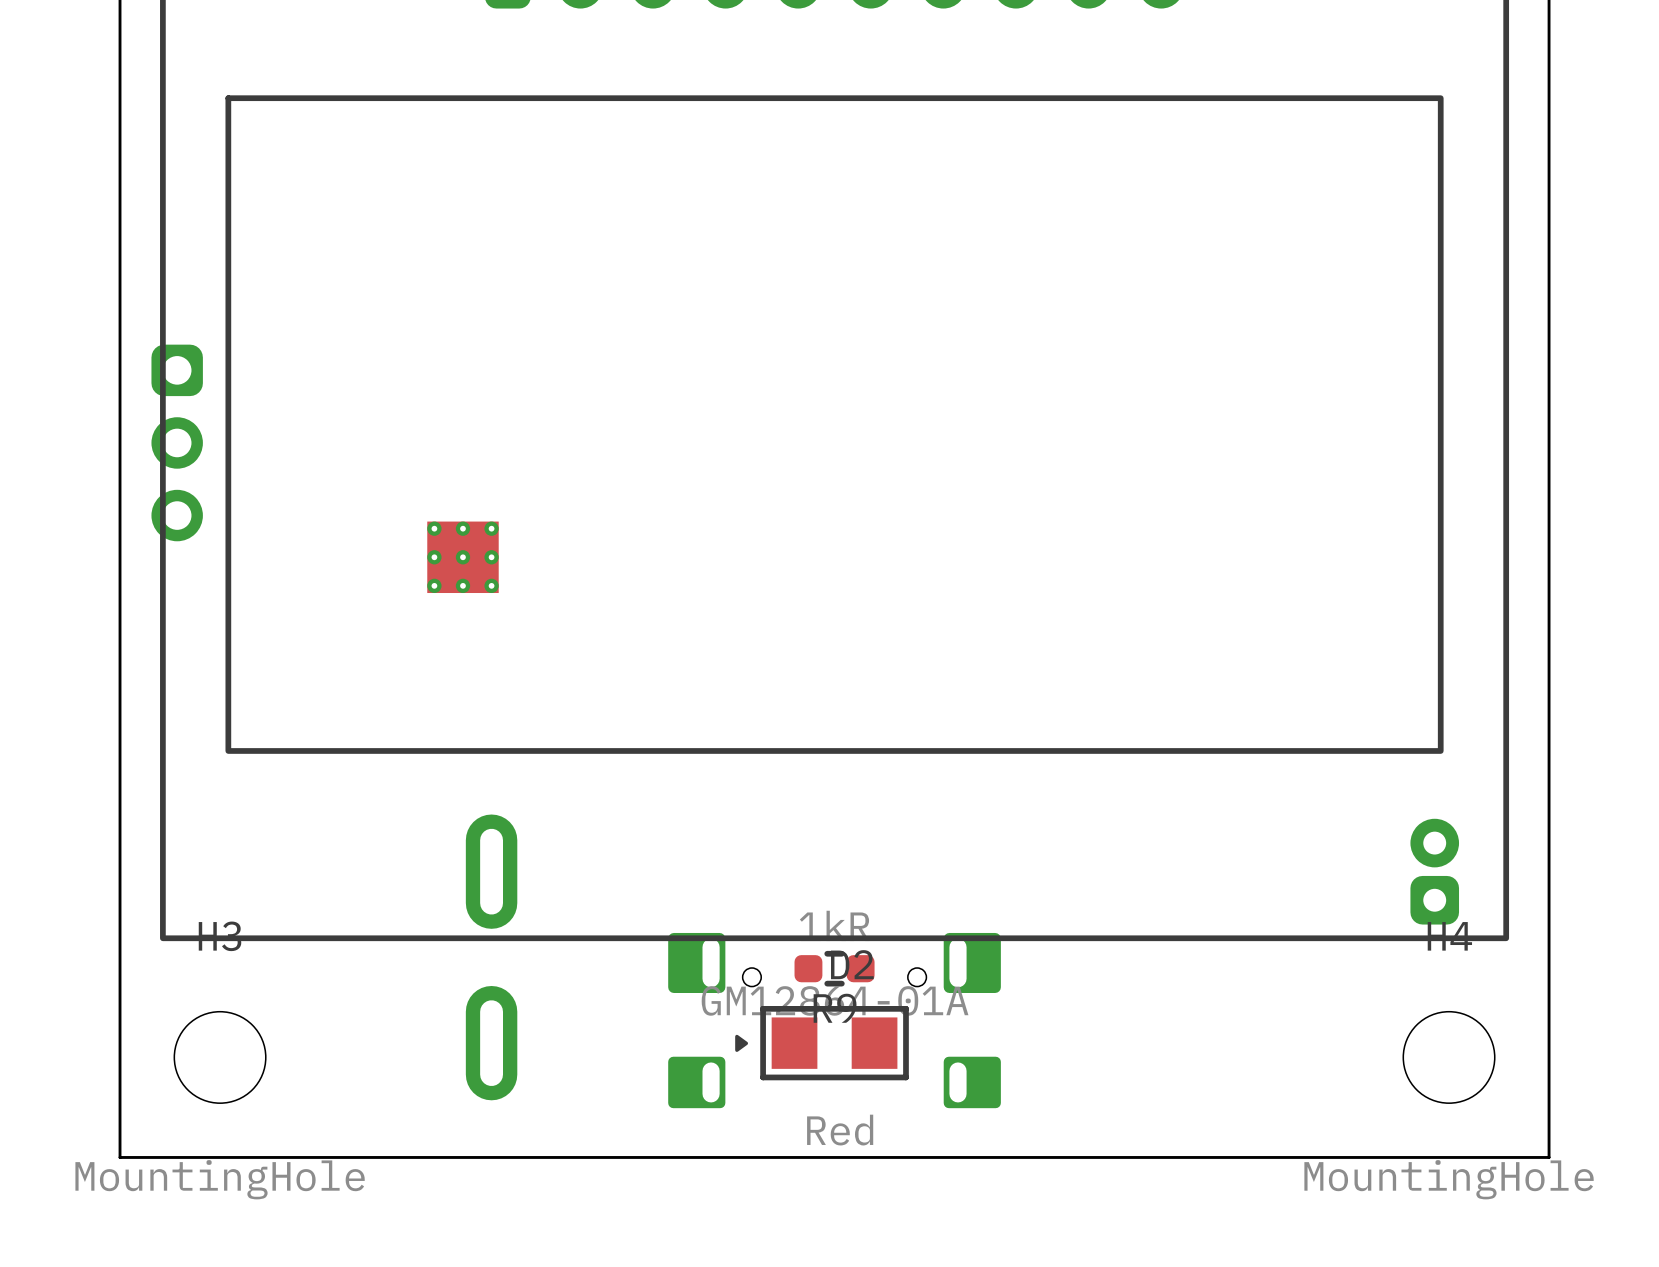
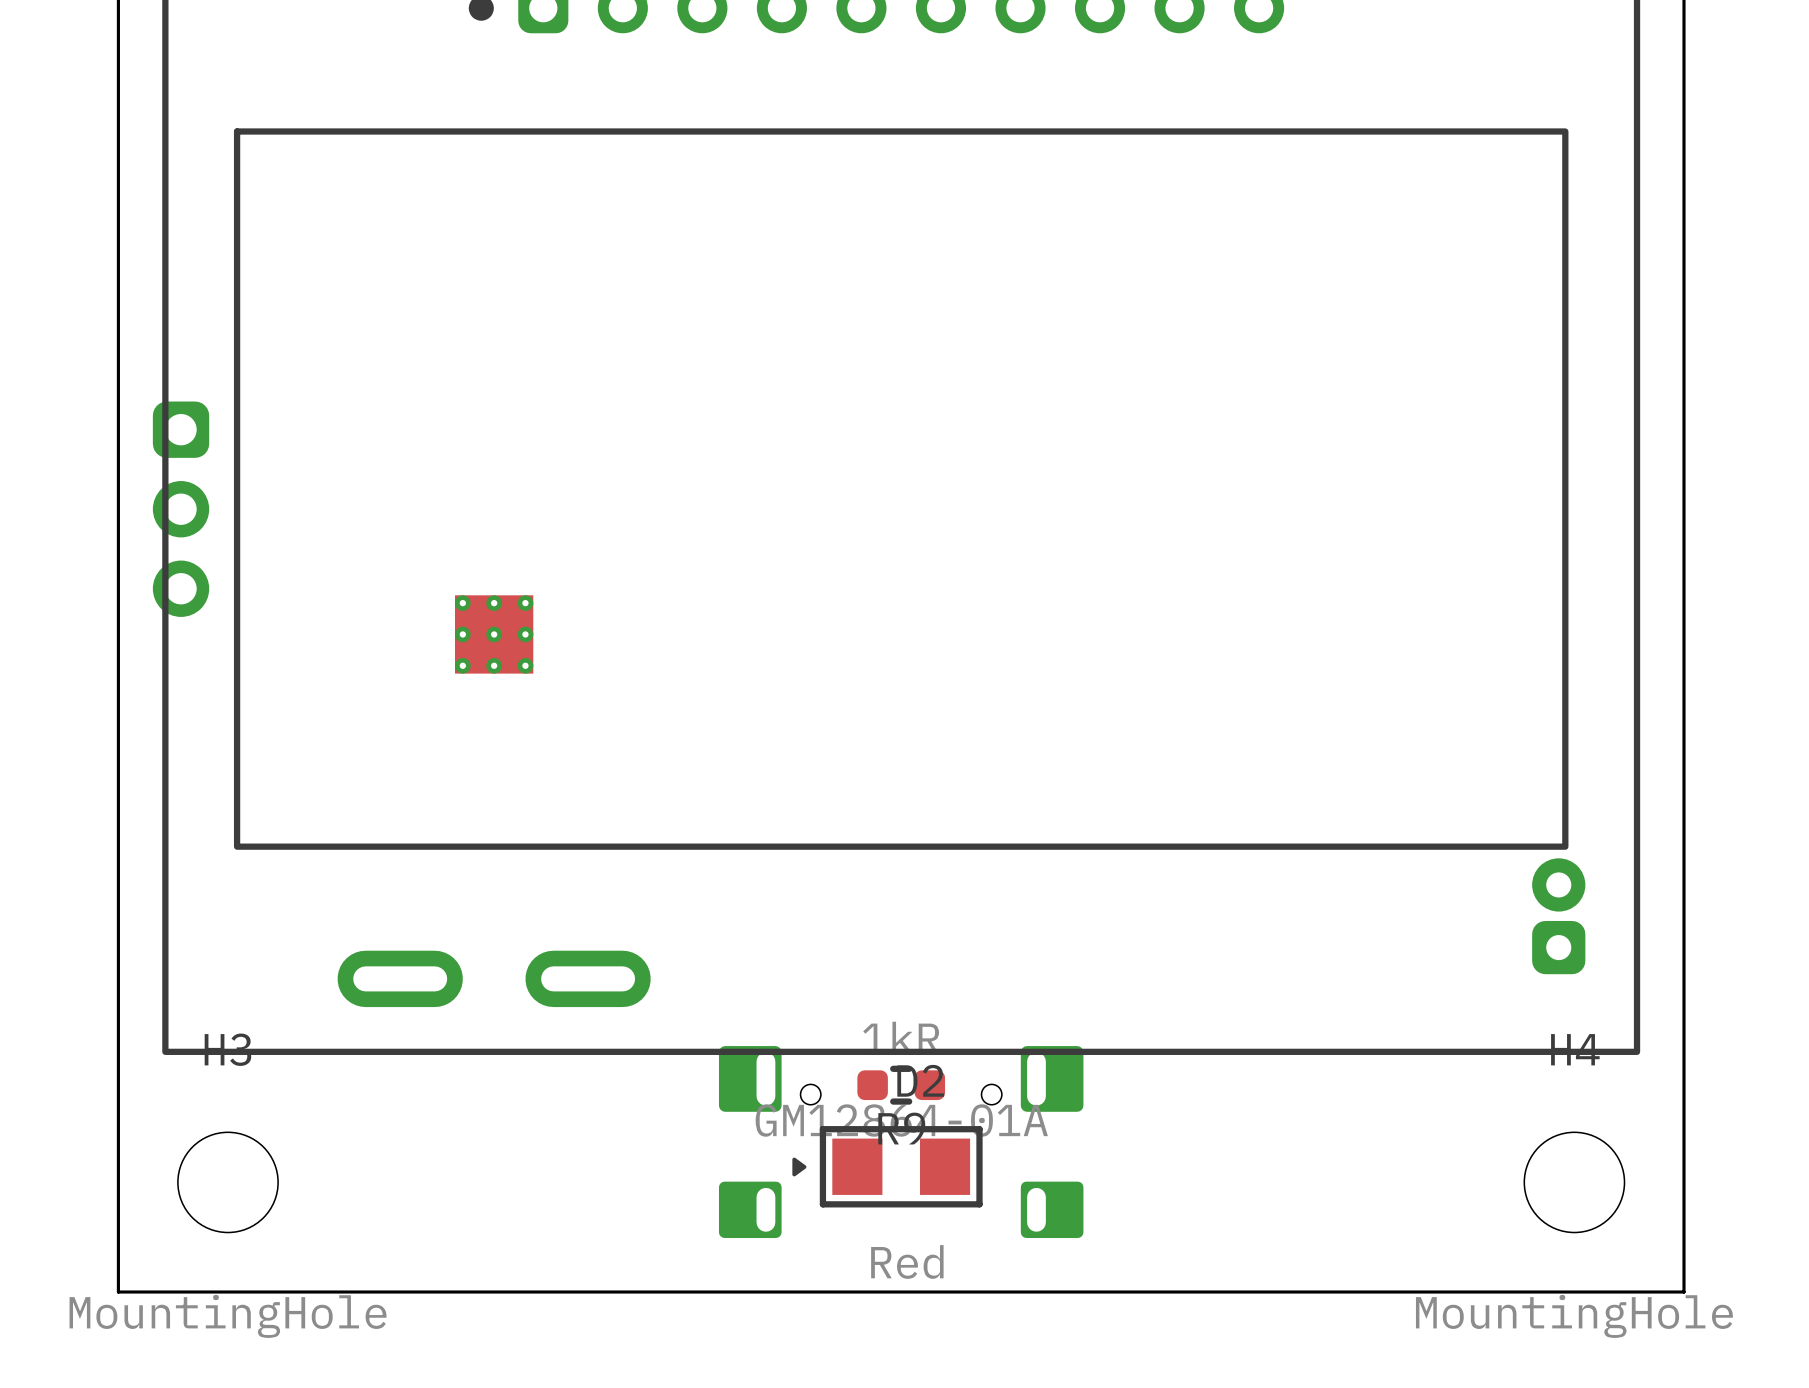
part position: (1434, 871) -> (1558, 916)
part rotation: 0° (491, 957) -> 90° clockwise (494, 978)

